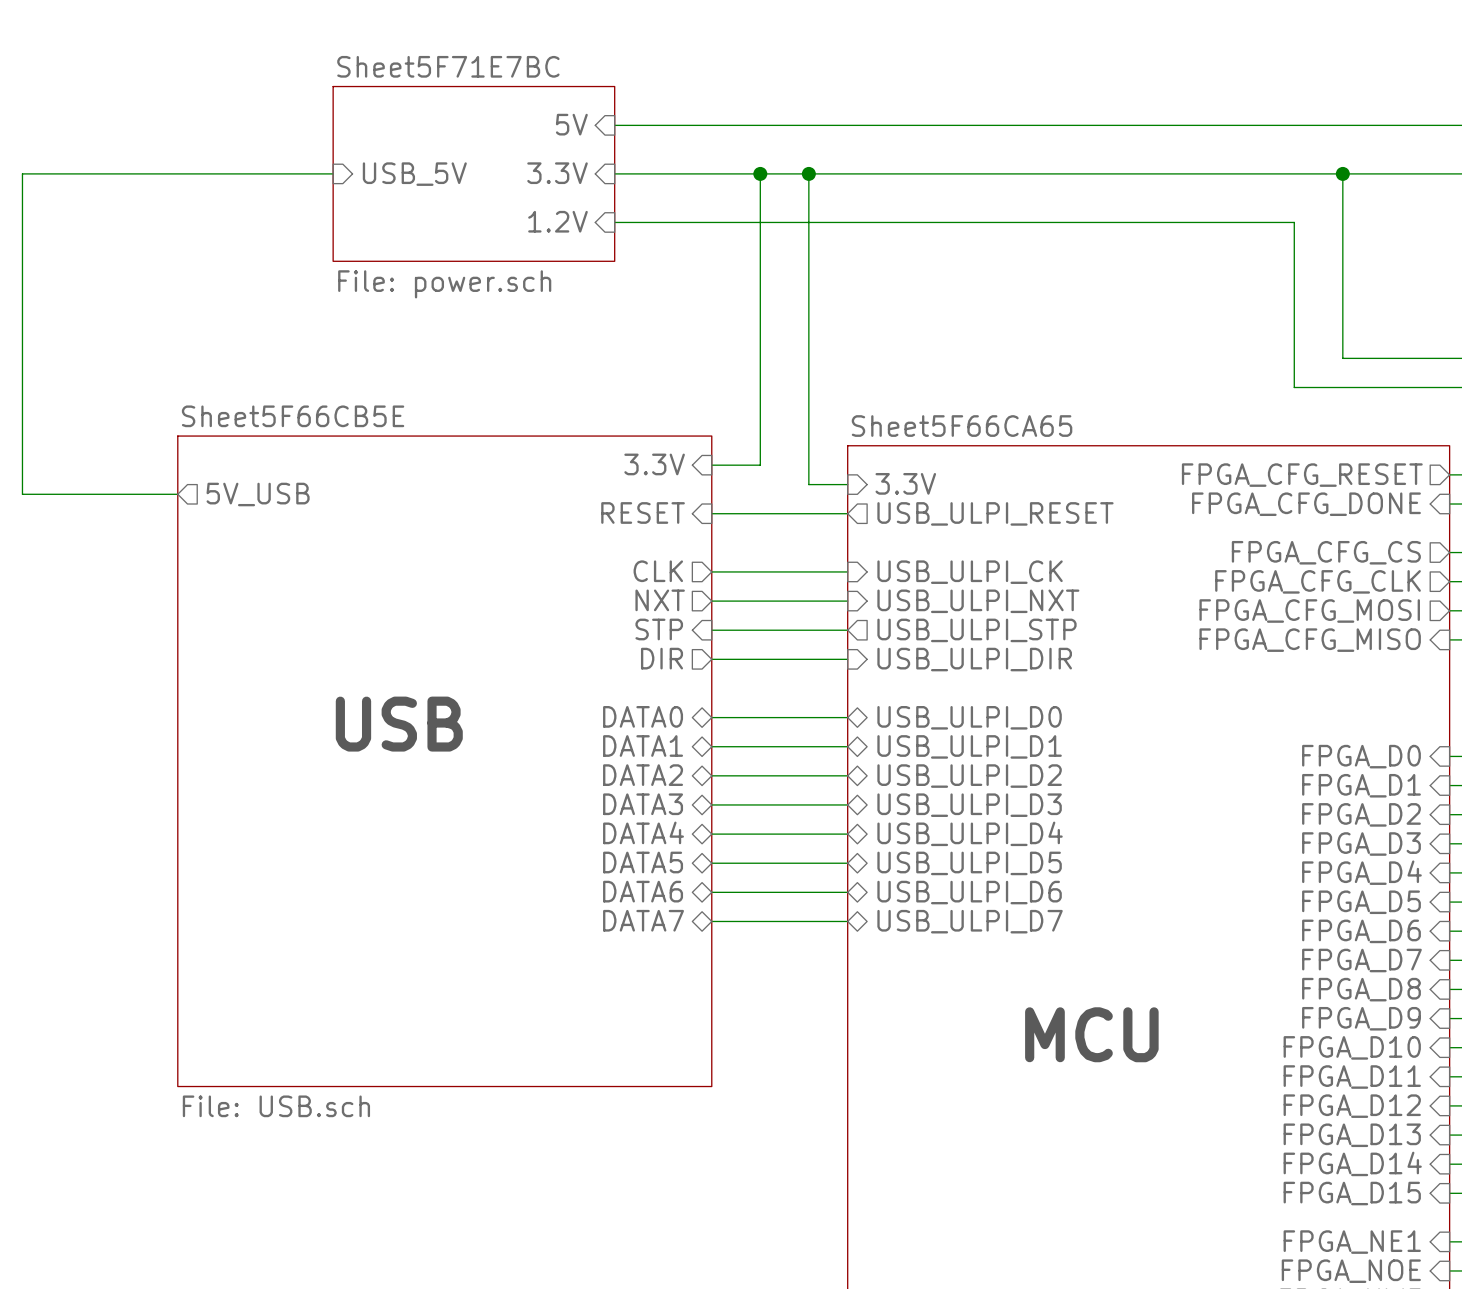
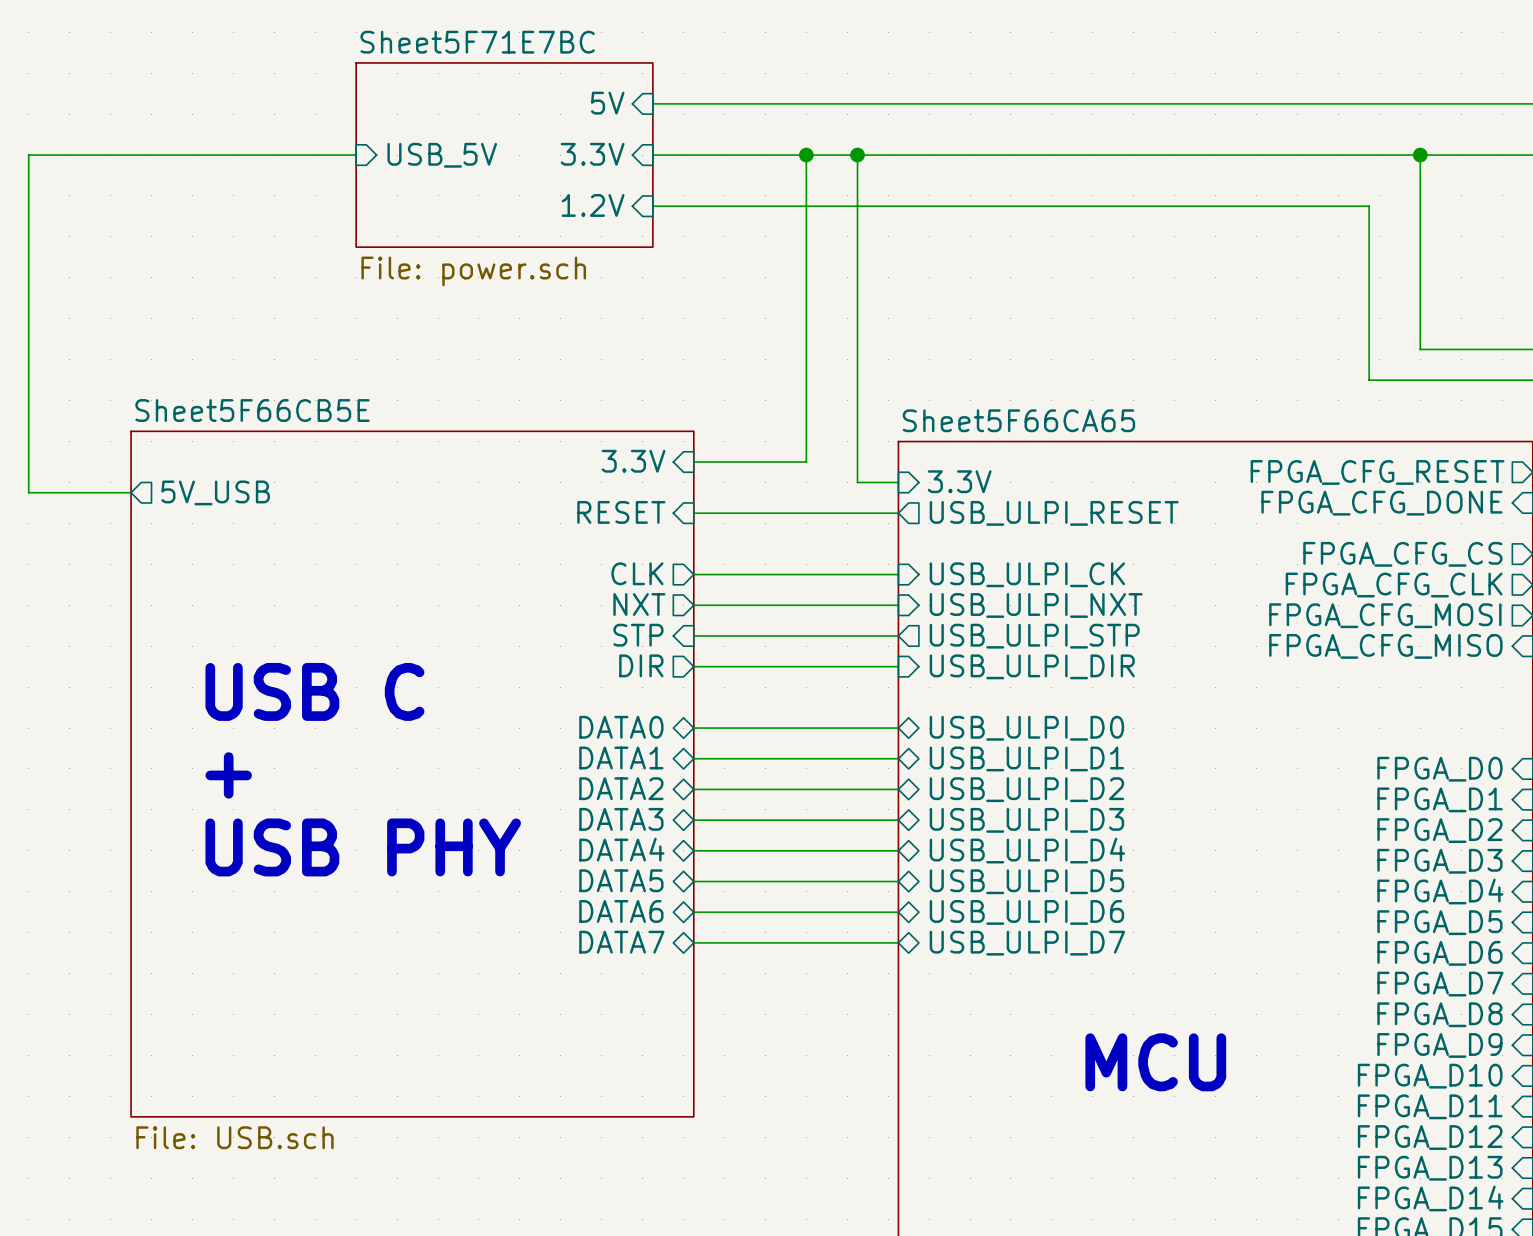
sheet pin position: 3.3V (654, 464) -> 3.3V (633, 461)
wire: none -> (693, 462) (755, 462)
wire: (119, 494) (177, 494) -> none
sheet pin position: 5V_USB (258, 494) -> 5V_USB (215, 492)
sheet pin position: RESET (643, 512) -> RESET (621, 512)
wire: none -> (693, 513) (755, 513)
wire: none -> (693, 574) (755, 574)
sheet pin position: CLK (658, 571) -> CLK (637, 573)
sheet pin position: NXT (660, 600) -> NXT (639, 604)
wire: none -> (693, 605) (755, 605)
sheet pin position: STP (659, 629) -> STP (638, 635)
wire: none -> (693, 635) (755, 635)
sheet pin position: DIR (662, 658) -> DIR (641, 665)
wire: none -> (693, 666) (755, 666)
sheet pin position: DATA0 (643, 716) -> DATA0 (621, 727)
wire: none -> (693, 728) (755, 728)
text: USB (399, 724) -> USB C (314, 691)
sheet pin position: DATA1 (643, 745) -> DATA1 (621, 757)
wire: none -> (693, 758) (755, 758)
sheet Sheet5F66CB5E position: (444, 761) -> (412, 774)
text: none -> + (228, 775)
sheet pin position: DATA2 (643, 775) -> DATA2 (621, 788)
wire: none -> (693, 789) (755, 789)
sheet pin position: DATA3 (643, 804) -> DATA3 (621, 819)
wire: none -> (693, 820) (755, 820)
text: none -> USB PHY (363, 847)
sheet pin position: DATA4 (643, 832) -> DATA4 (621, 849)
wire: none -> (693, 850) (755, 850)
sheet pin position: DATA5 (643, 862) -> DATA5 (621, 880)
wire: none -> (693, 881) (755, 881)
sheet pin position: DATA6 (643, 891) -> DATA6 (621, 911)
wire: none -> (693, 912) (755, 912)
sheet pin position: DATA7 (643, 920) -> DATA7 (621, 942)
wire: none -> (693, 942) (755, 942)

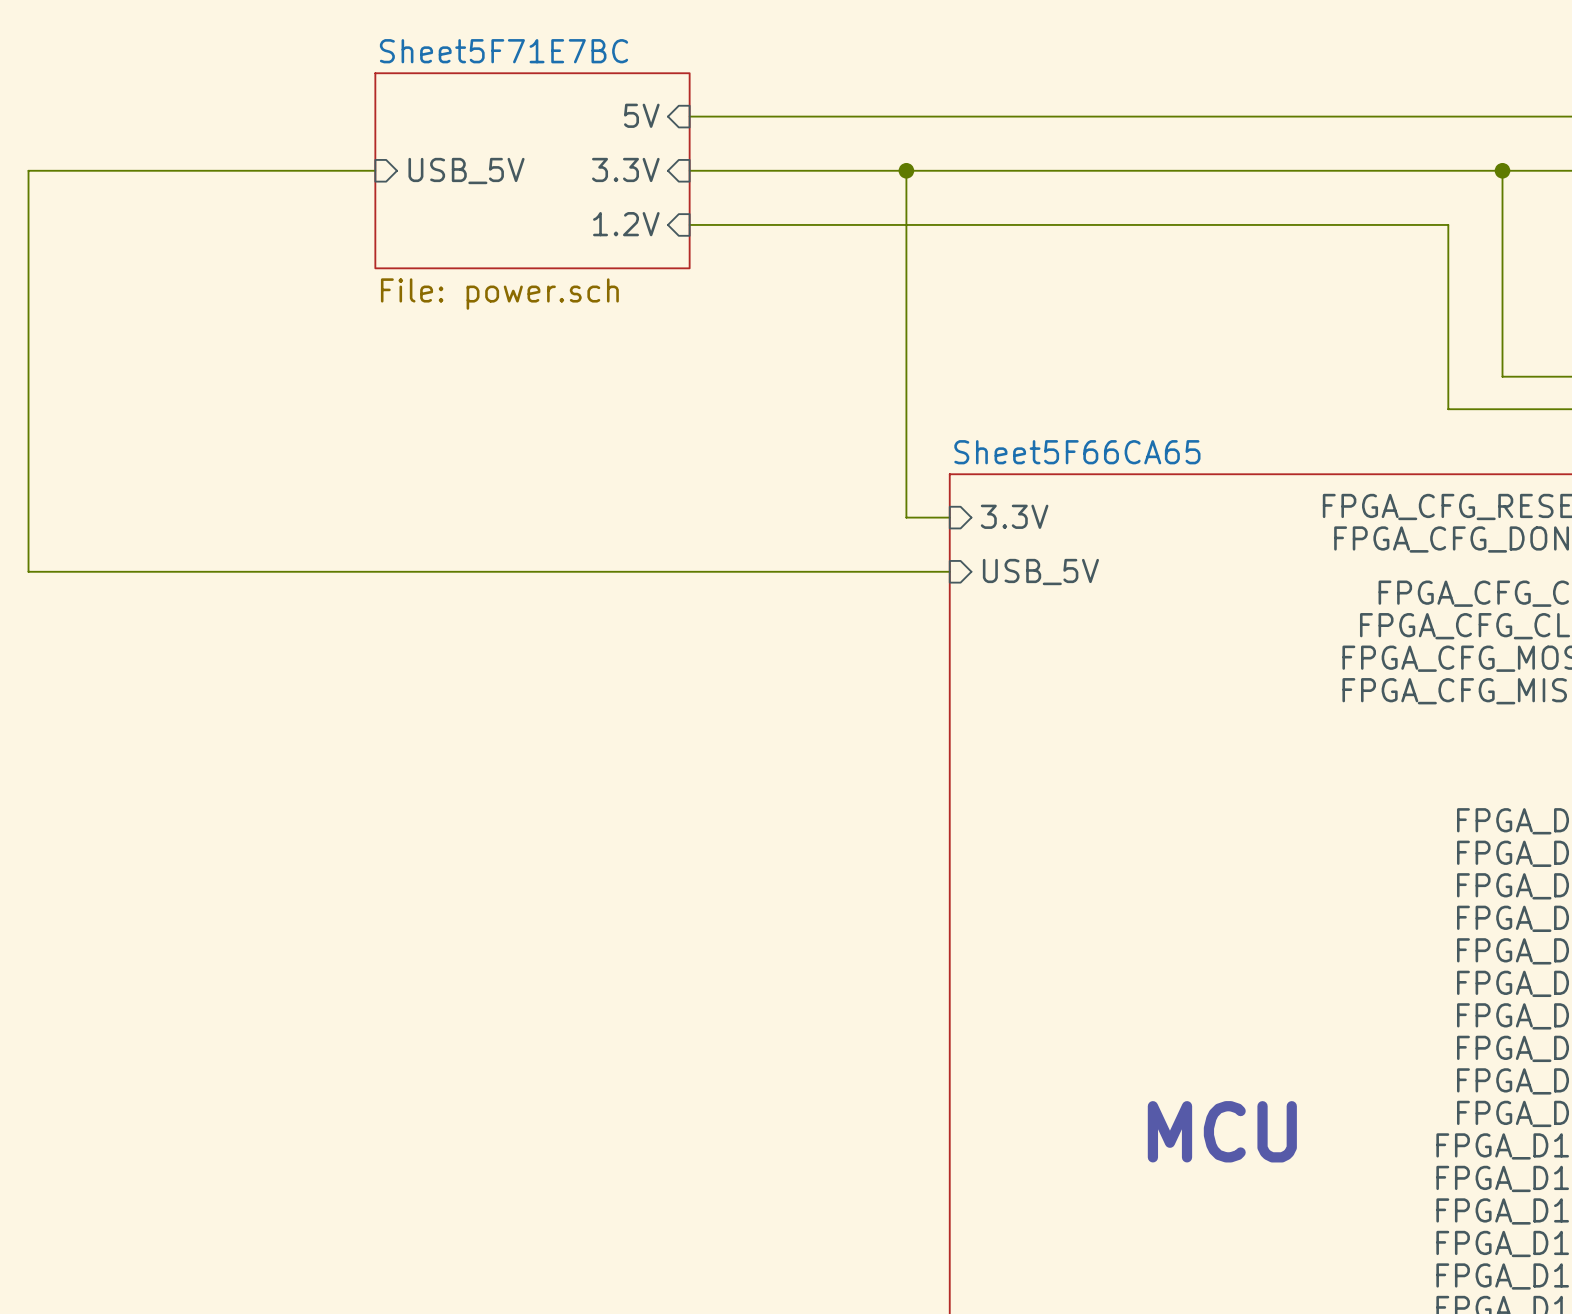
wire: (806, 155) (806, 462) (693, 462) -> none
junction: (806, 155) -> none
sheet pin: 3.3V (633, 461) -> none
wire: (28, 492) (131, 492) -> (28, 528) (28, 571) (949, 571)
sheet pin: 5V_USB (215, 492) -> none
sheet pin: RESET (621, 512) -> none
wire: (693, 513) (898, 513) -> none
sheet pin: USB_ULPI_RESET (1054, 513) -> none
sheet pin: none -> USB_5V (1040, 572)
sheet pin: CLK (637, 573) -> none
wire: (693, 574) (898, 574) -> none
sheet pin: USB_ULPI_CK (1027, 574) -> none
sheet pin: NXT (639, 604) -> none
wire: (693, 605) (898, 605) -> none
sheet pin: USB_ULPI_NXT (1036, 605) -> none
sheet pin: STP (638, 635) -> none
wire: (693, 635) (898, 635) -> none
sheet pin: USB_ULPI_STP (1034, 636) -> none
sheet pin: DIR (641, 665) -> none
wire: (693, 666) (898, 666) -> none
sheet pin: USB_ULPI_DIR (1032, 666) -> none
text: USB C (314, 691) -> none
sheet pin: DATA0 (621, 727) -> none
wire: (693, 728) (898, 728) -> none
sheet pin: USB_ULPI_D0 (1026, 728) -> none
sheet pin: DATA1 (621, 757) -> none
wire: (693, 758) (898, 758) -> none
sheet pin: USB_ULPI_D1 (1026, 758) -> none
sheet Sheet5F66CB5E: File: USB.sch (412, 774) -> none
text: + (228, 775) -> none
sheet pin: DATA2 (621, 788) -> none
wire: (693, 789) (898, 789) -> none
sheet pin: USB_ULPI_D2 (1026, 789) -> none
sheet pin: DATA3 (621, 819) -> none
wire: (693, 820) (898, 820) -> none
sheet pin: USB_ULPI_D3 (1026, 820) -> none
text: USB PHY (363, 847) -> none
sheet pin: DATA4 (621, 849) -> none
wire: (693, 850) (898, 850) -> none
sheet pin: USB_ULPI_D4 (1027, 850) -> none
sheet pin: DATA5 (621, 880) -> none
wire: (693, 881) (898, 881) -> none
sheet pin: USB_ULPI_D5 (1026, 881) -> none
sheet pin: DATA6 (621, 911) -> none
wire: (693, 912) (898, 912) -> none
sheet pin: USB_ULPI_D6 (1026, 912) -> none
sheet pin: DATA7 (621, 942) -> none
wire: (693, 942) (898, 942) -> none
sheet pin: USB_ULPI_D7 (1027, 943) -> none

